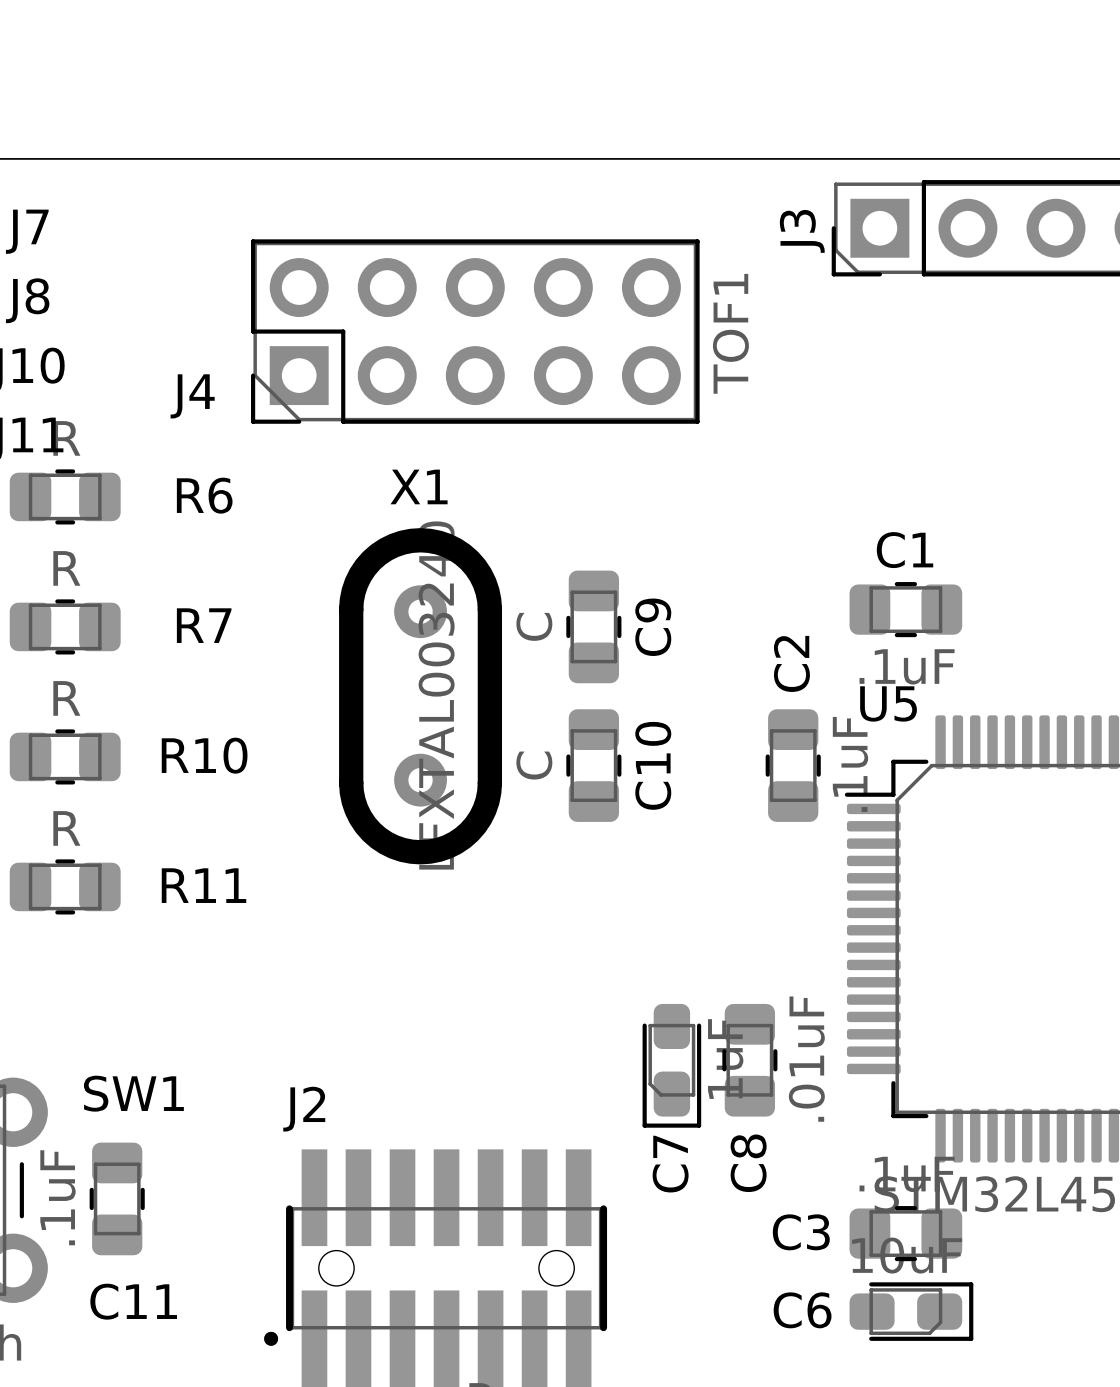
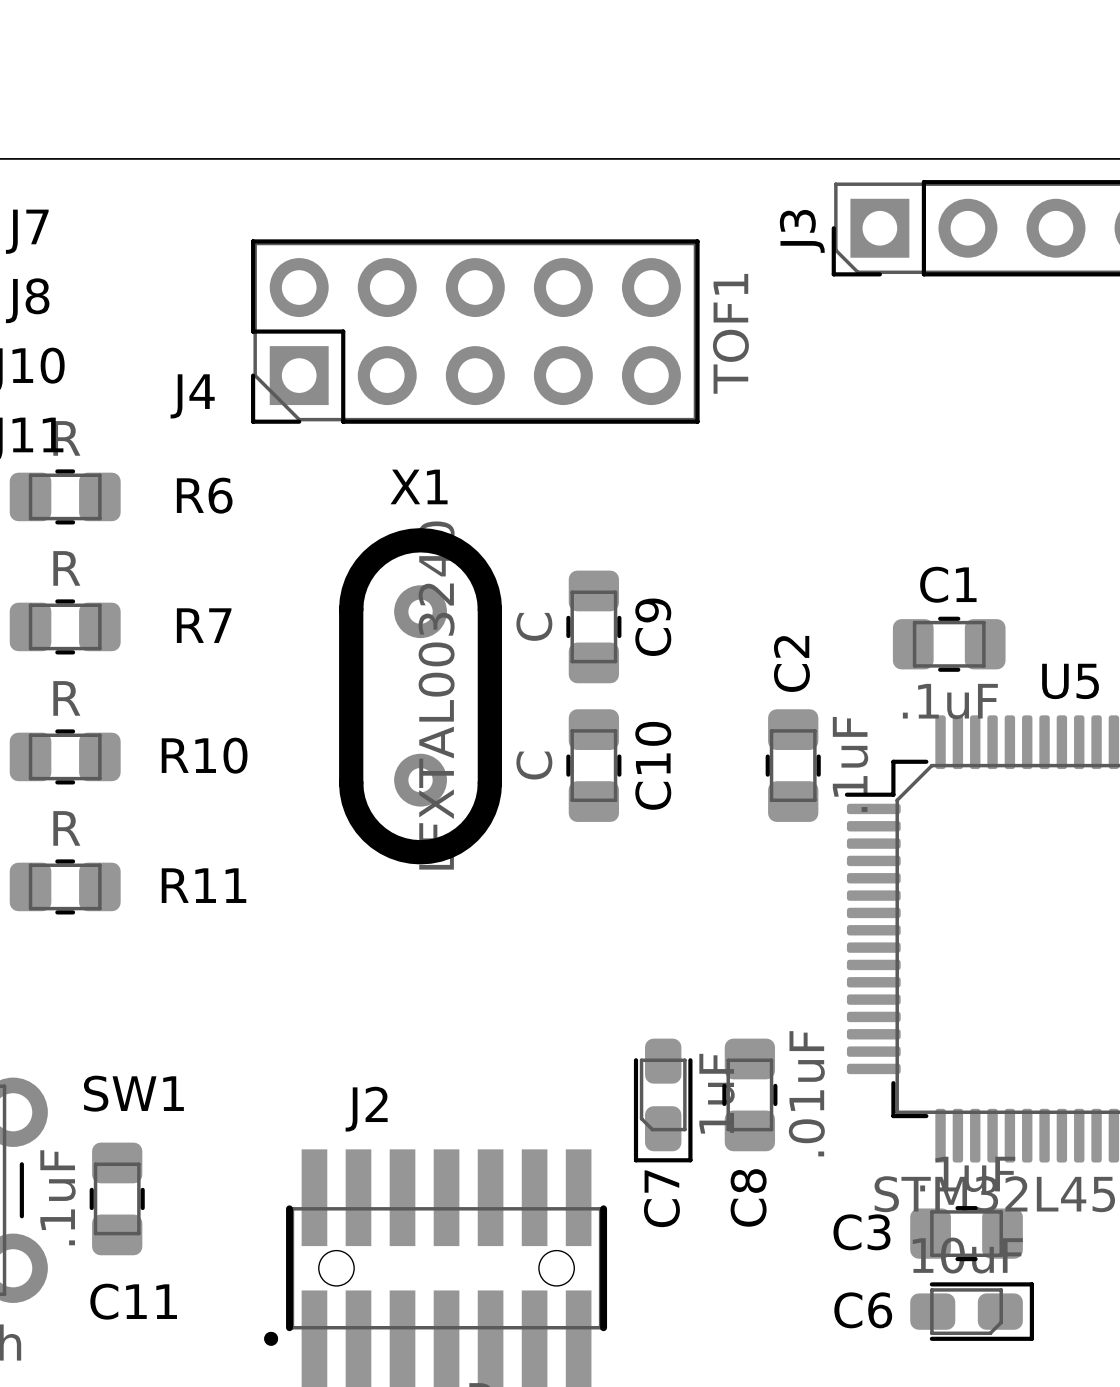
C1 position: (905, 609) -> (949, 644)
U5 name position: U5 (888, 703) -> U5 (1070, 681)
C8 position: (749, 1060) -> (749, 1094)
C7 position: (671, 1065) -> (663, 1100)
J2 name position: J2 (304, 1109) -> J2 (366, 1109)
C3 position: (905, 1233) -> (966, 1233)
C6 position: (911, 1311) -> (972, 1311)

